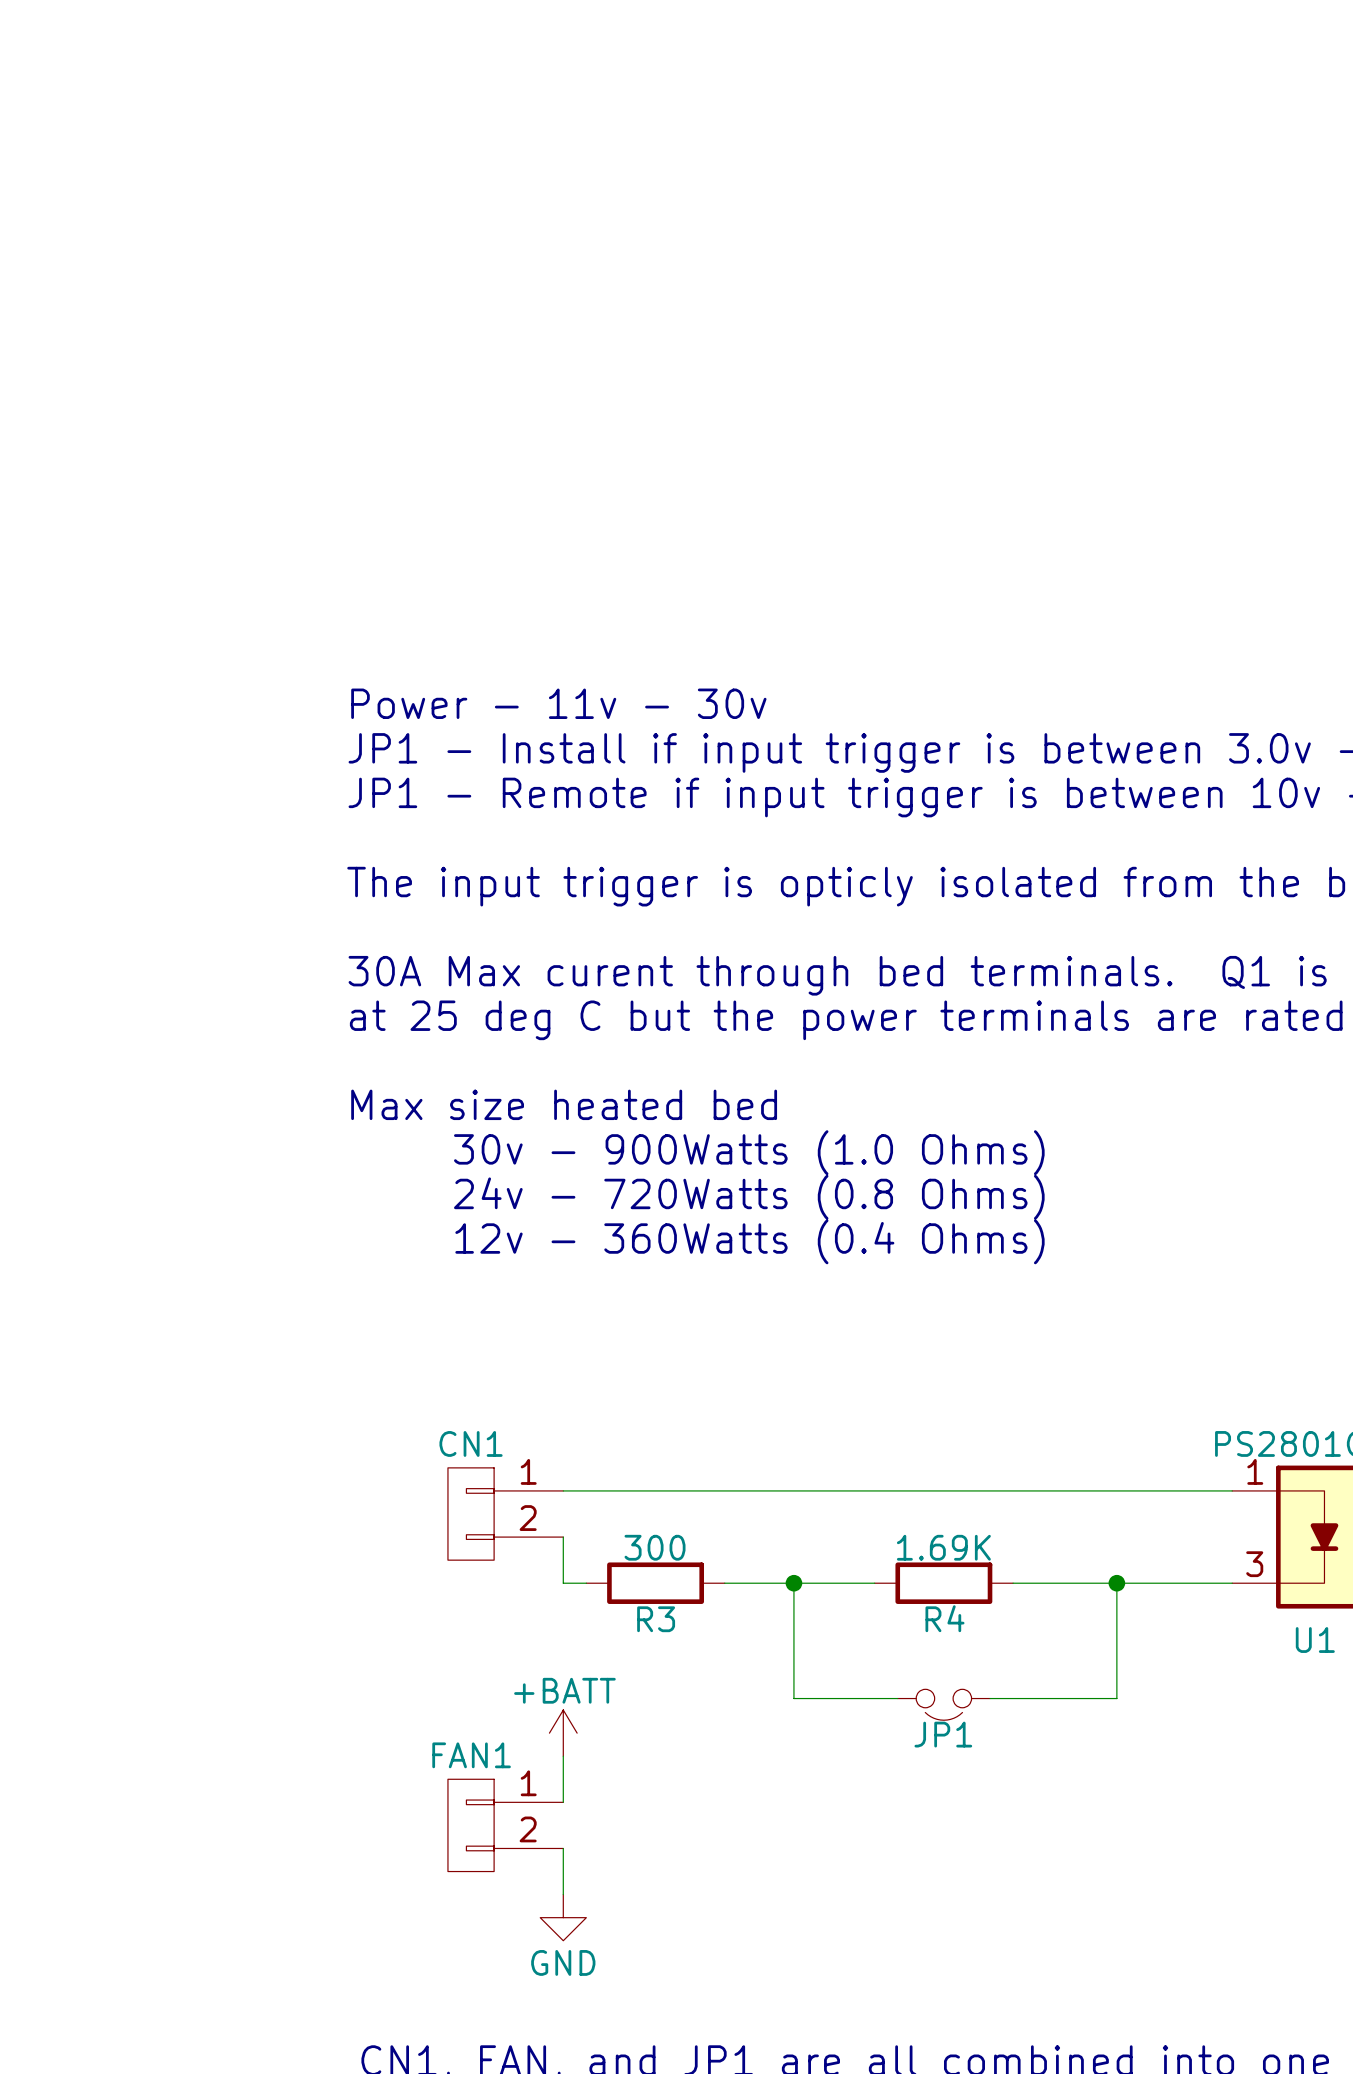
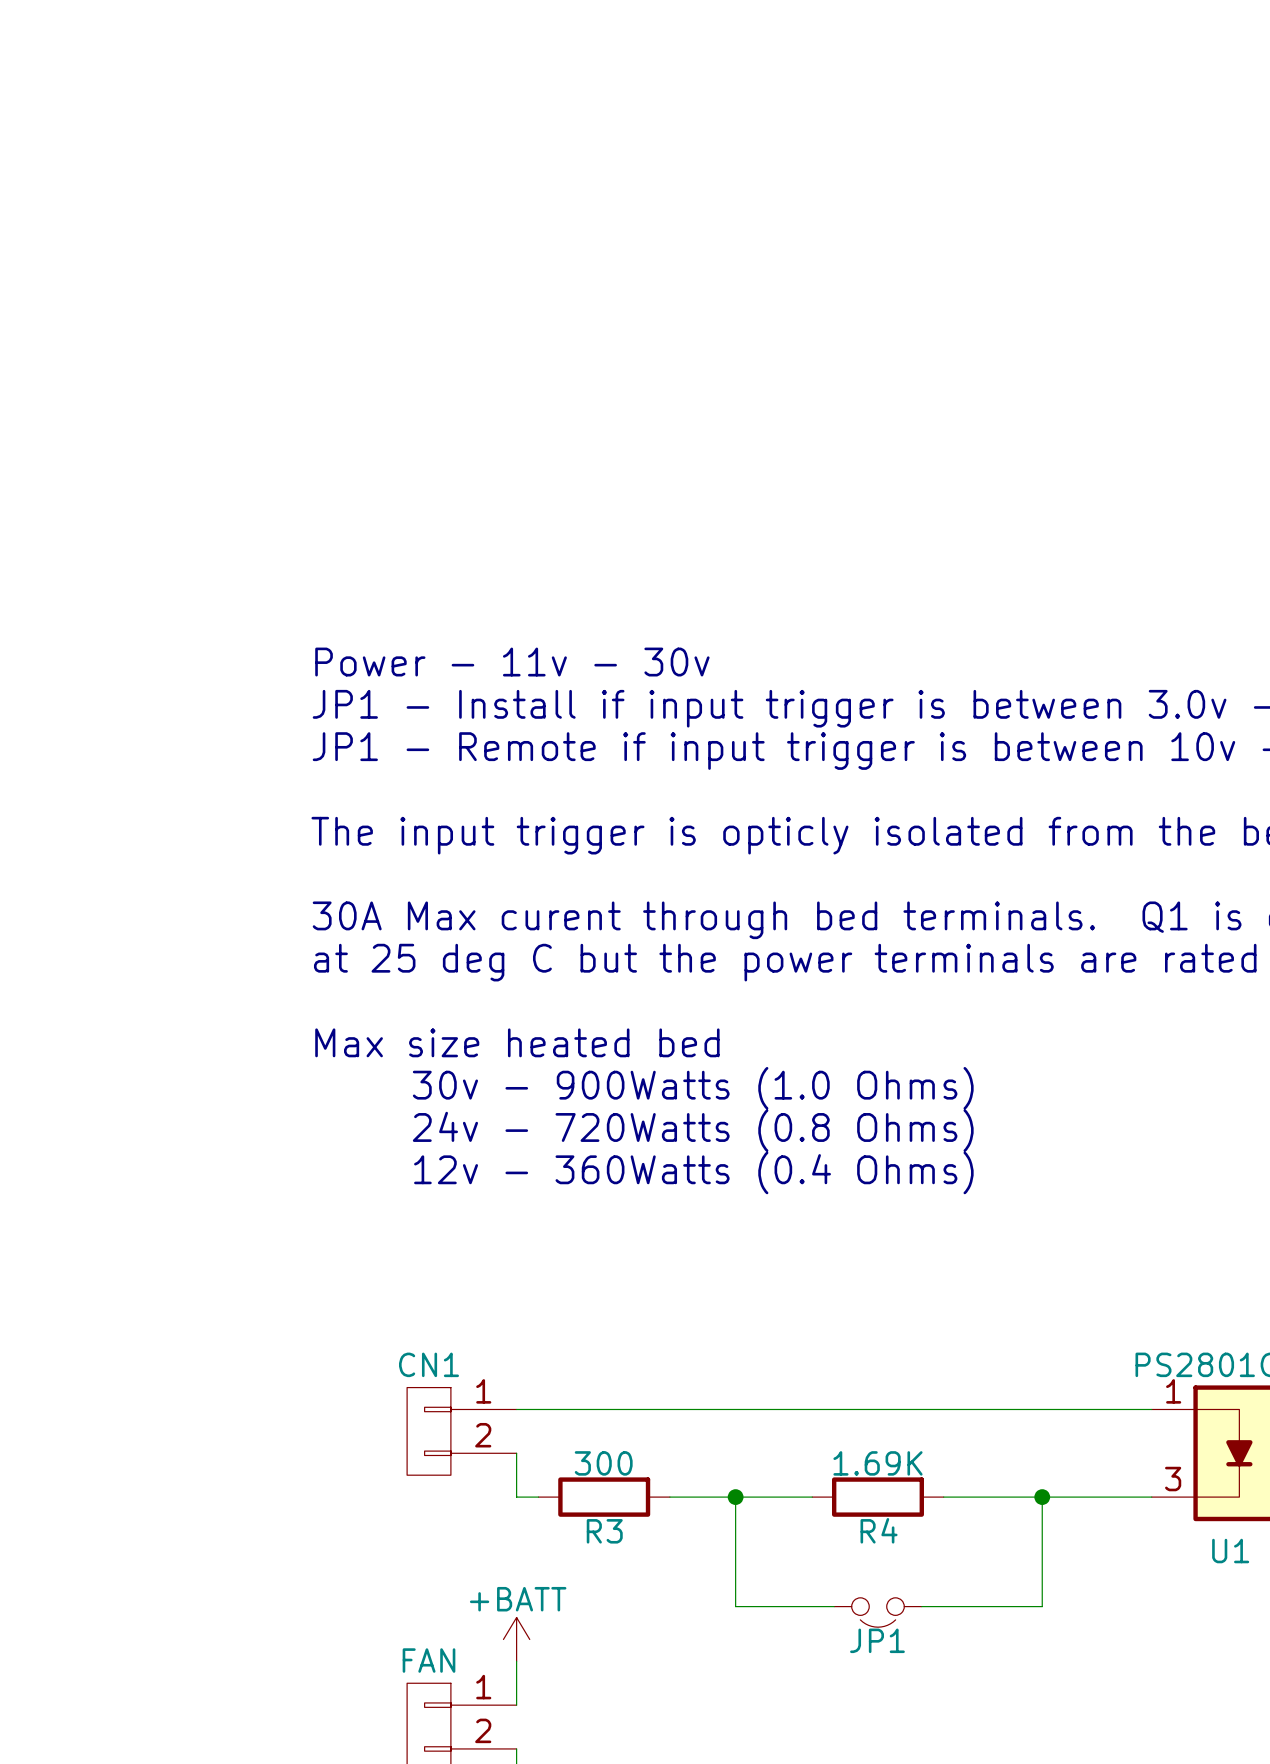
FAN1 name: FAN1 (471, 1755) -> FAN (429, 1660)

